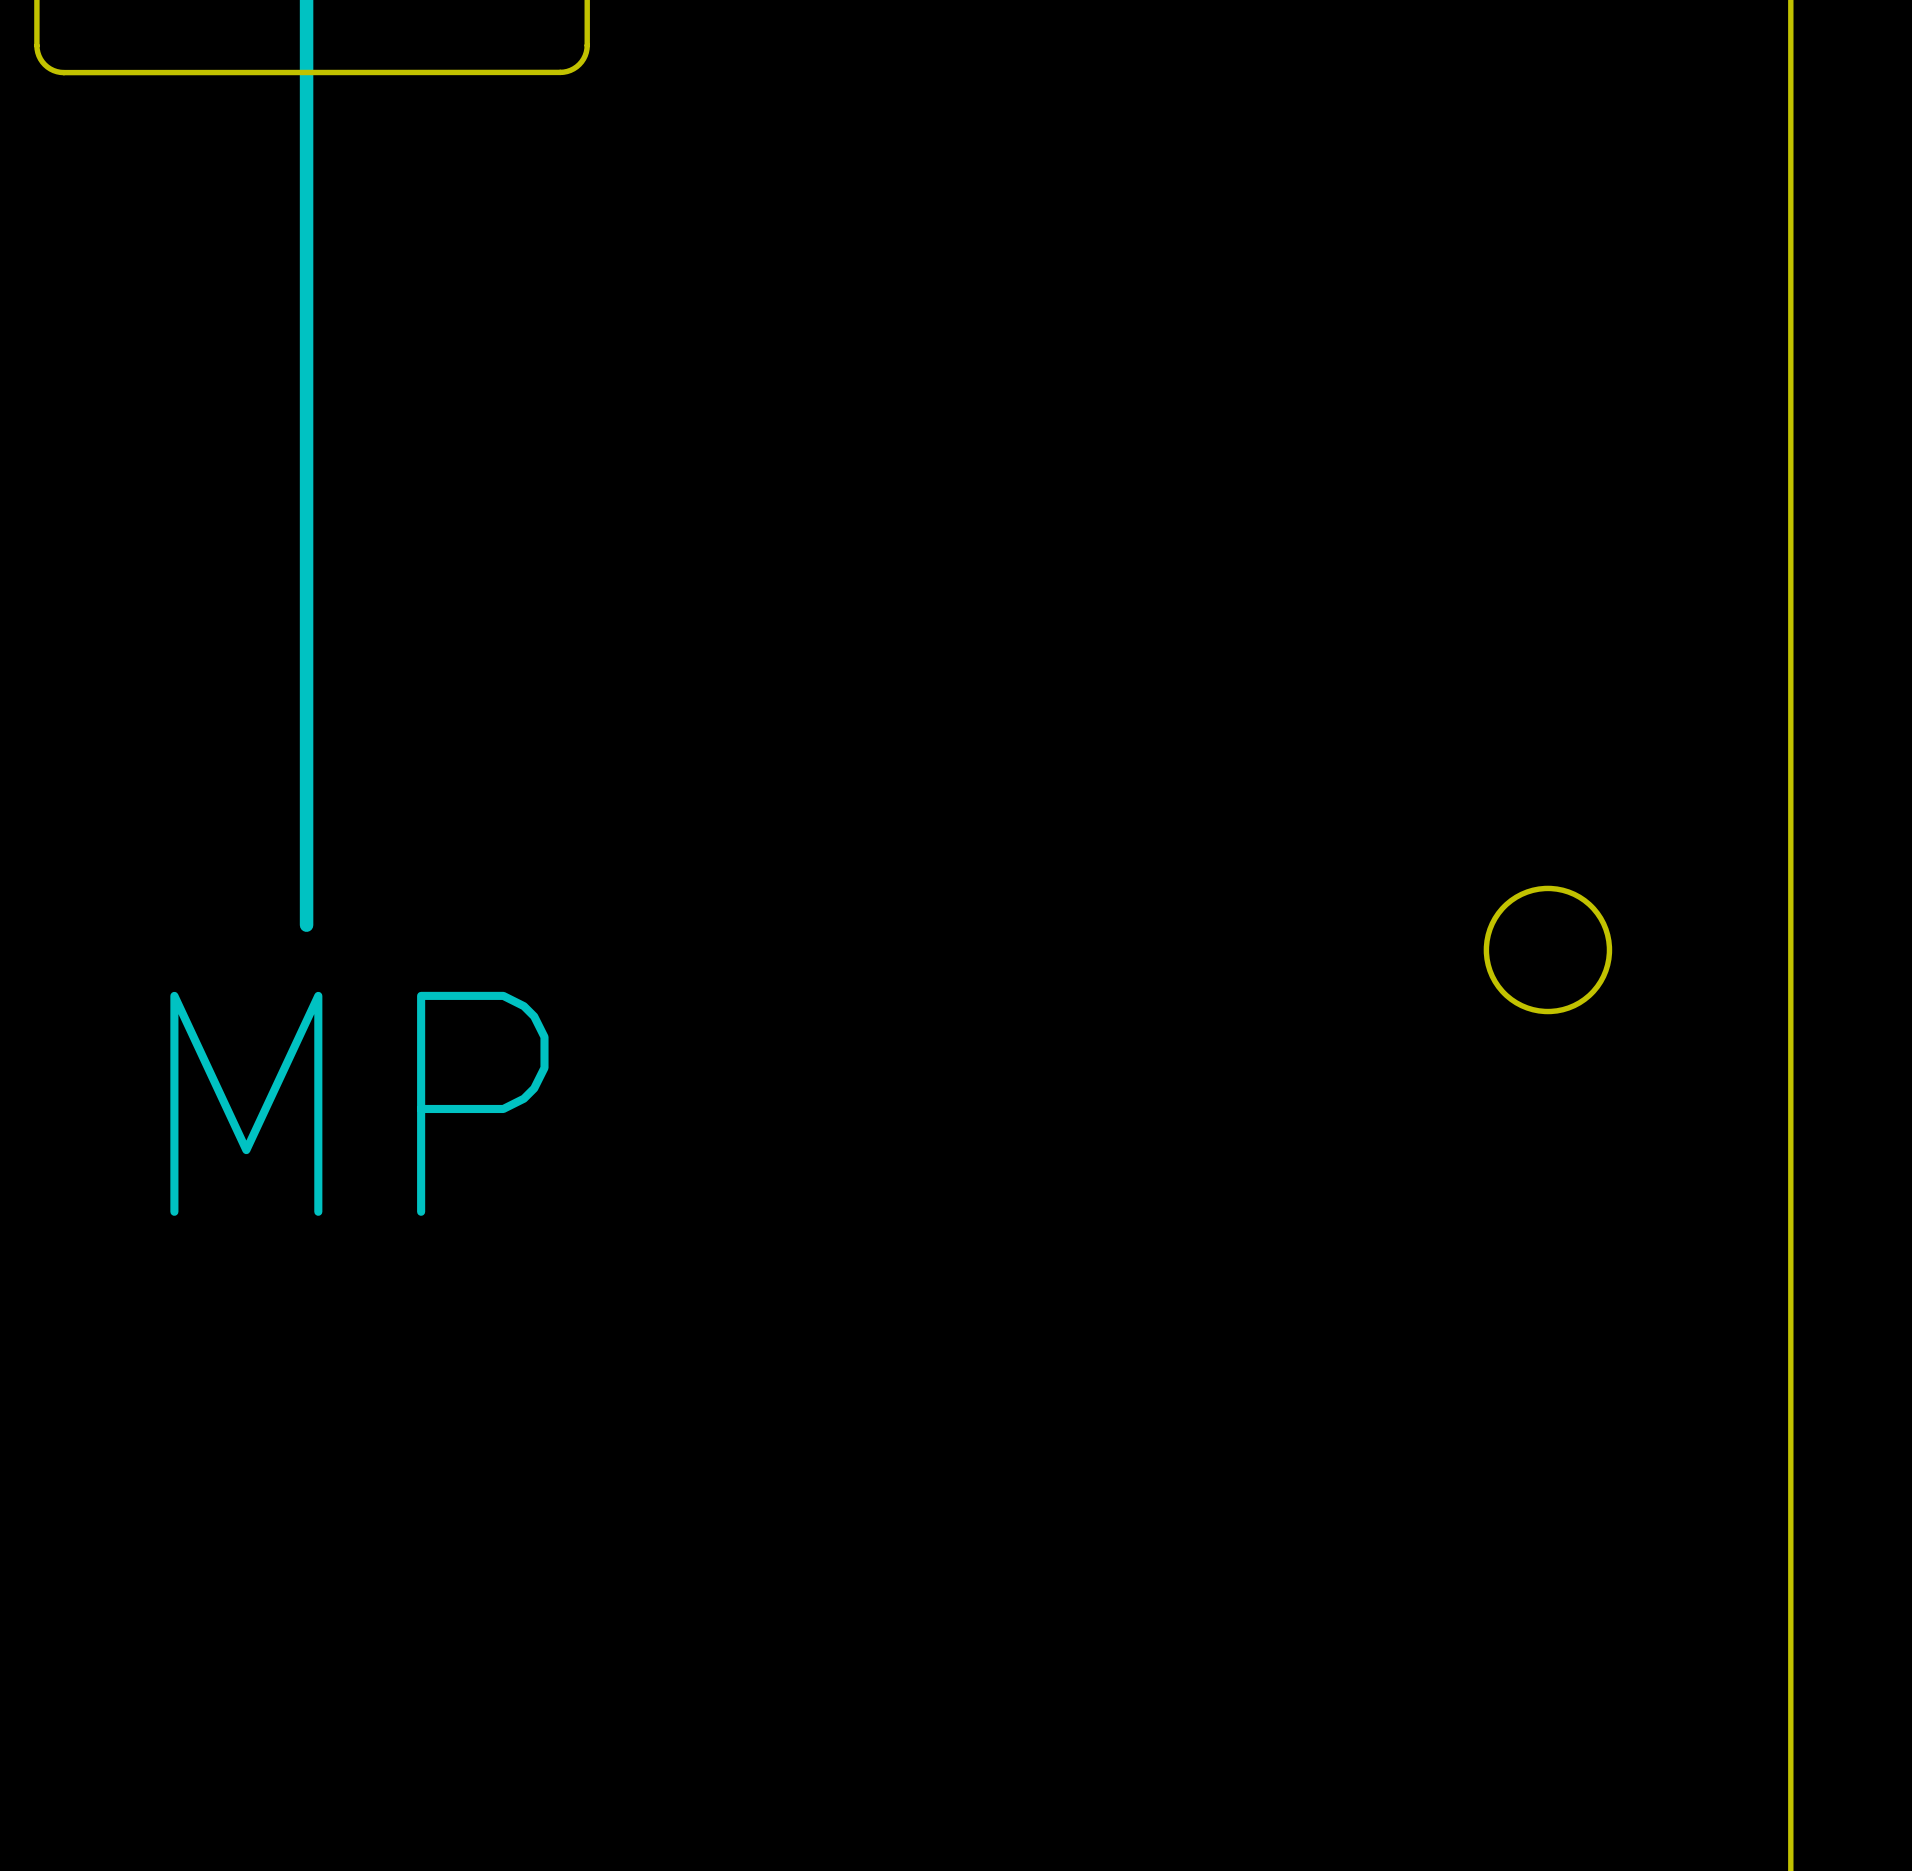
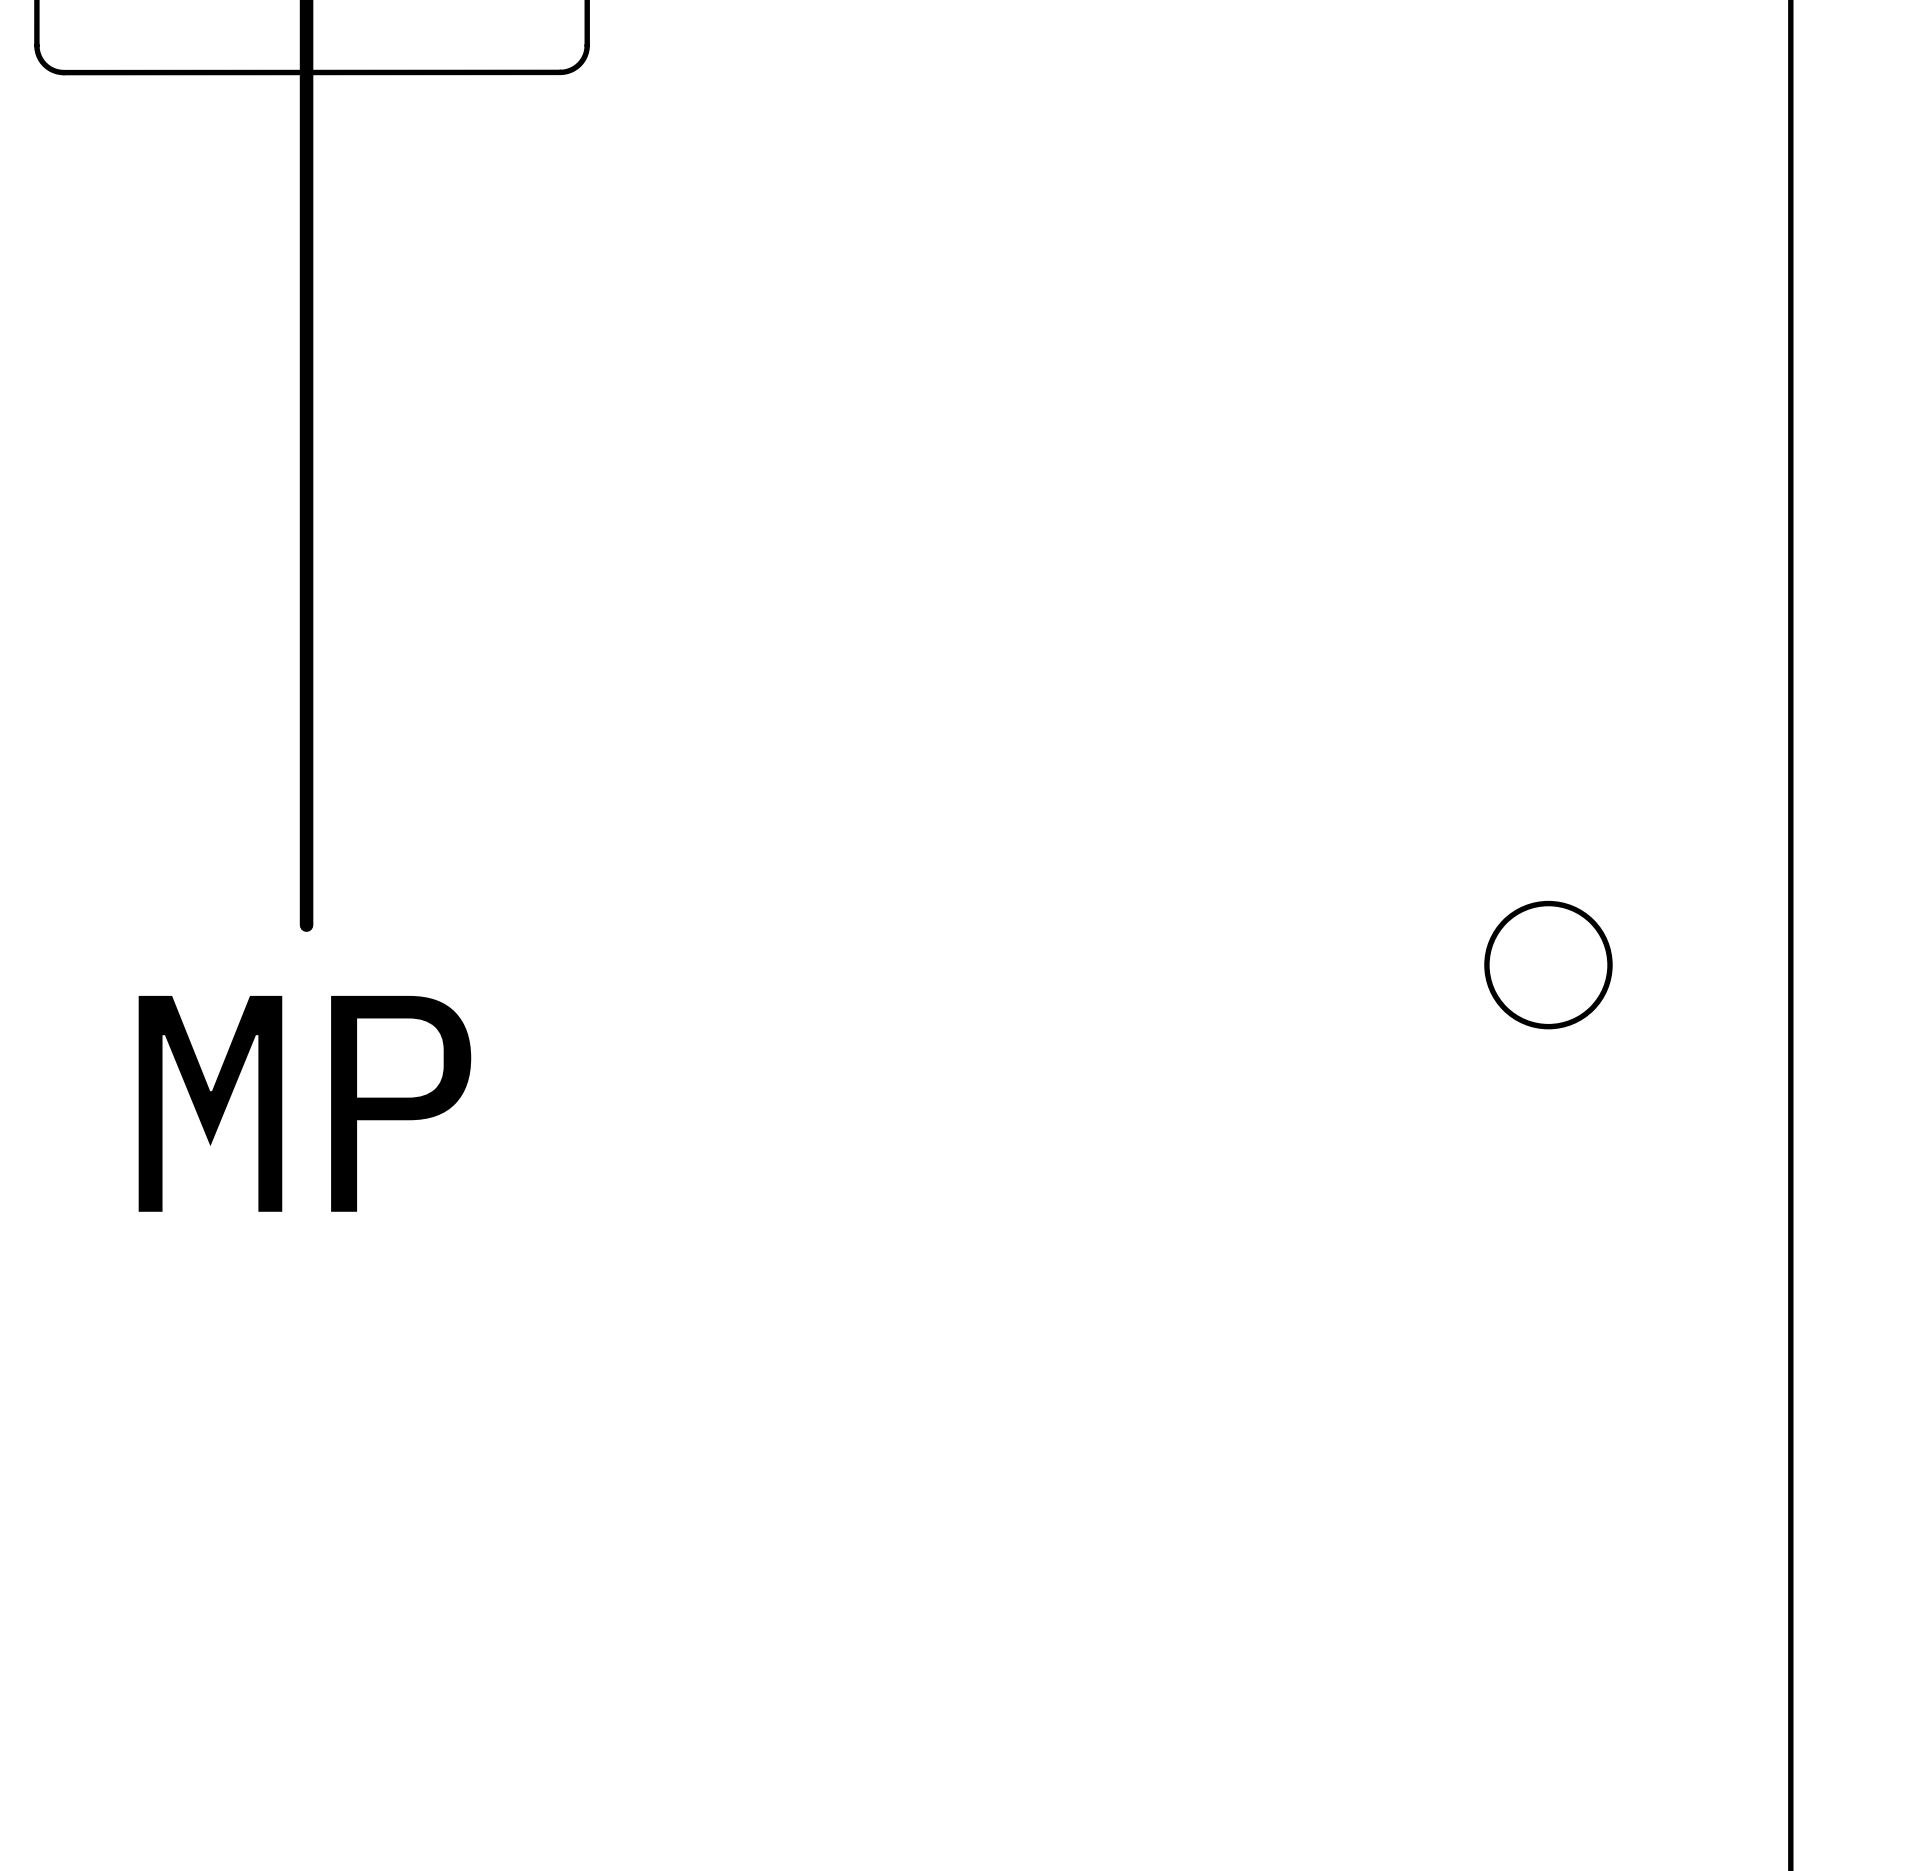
round board edge position: (1547, 949) -> (1548, 965)

